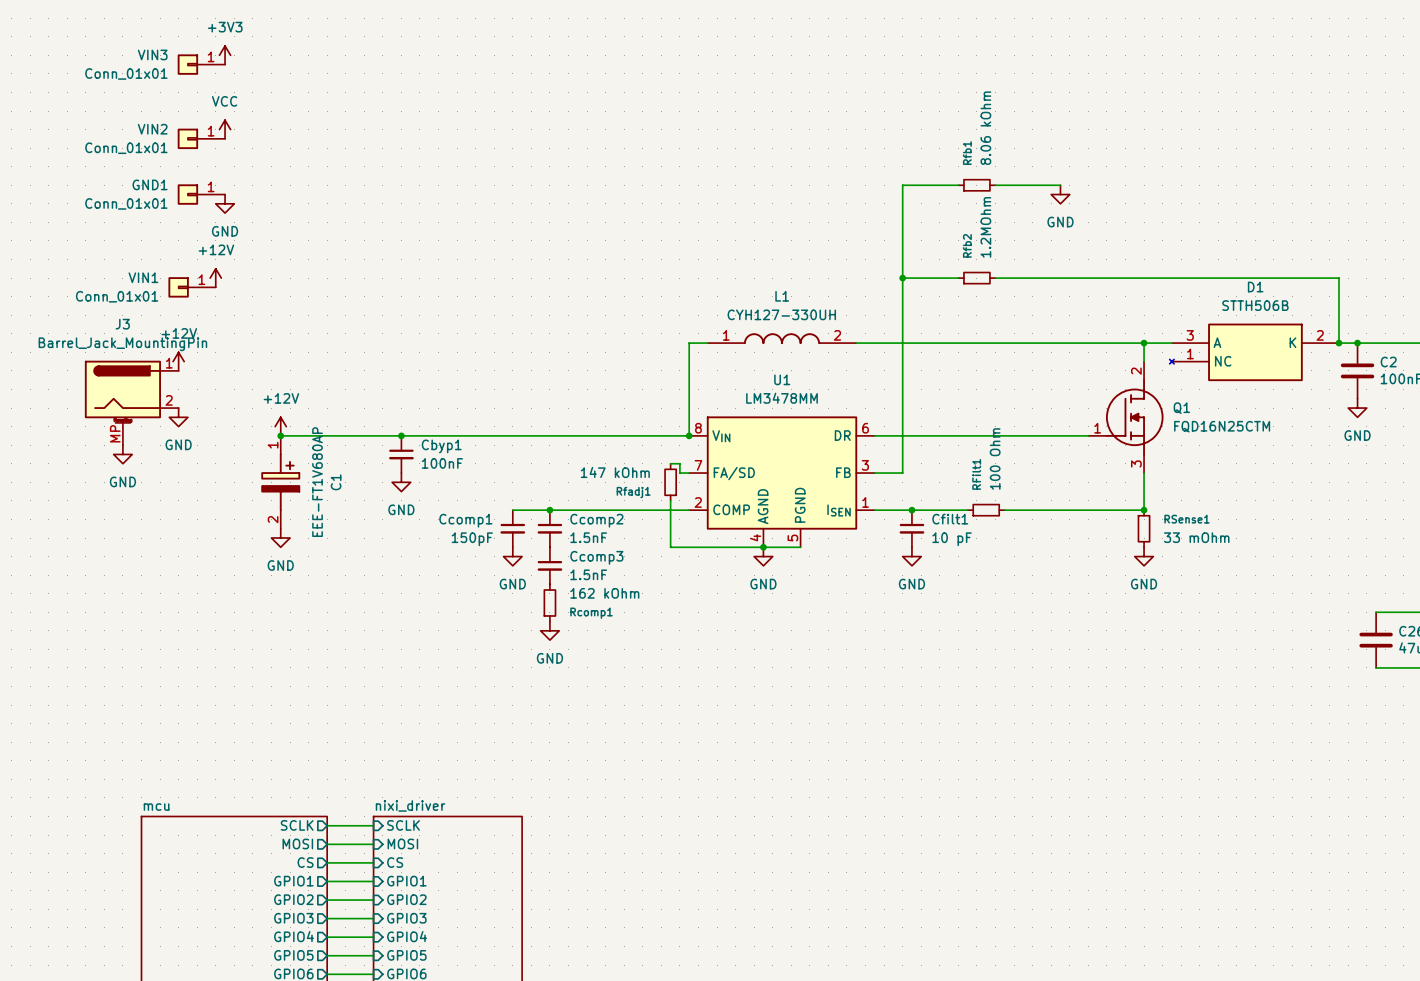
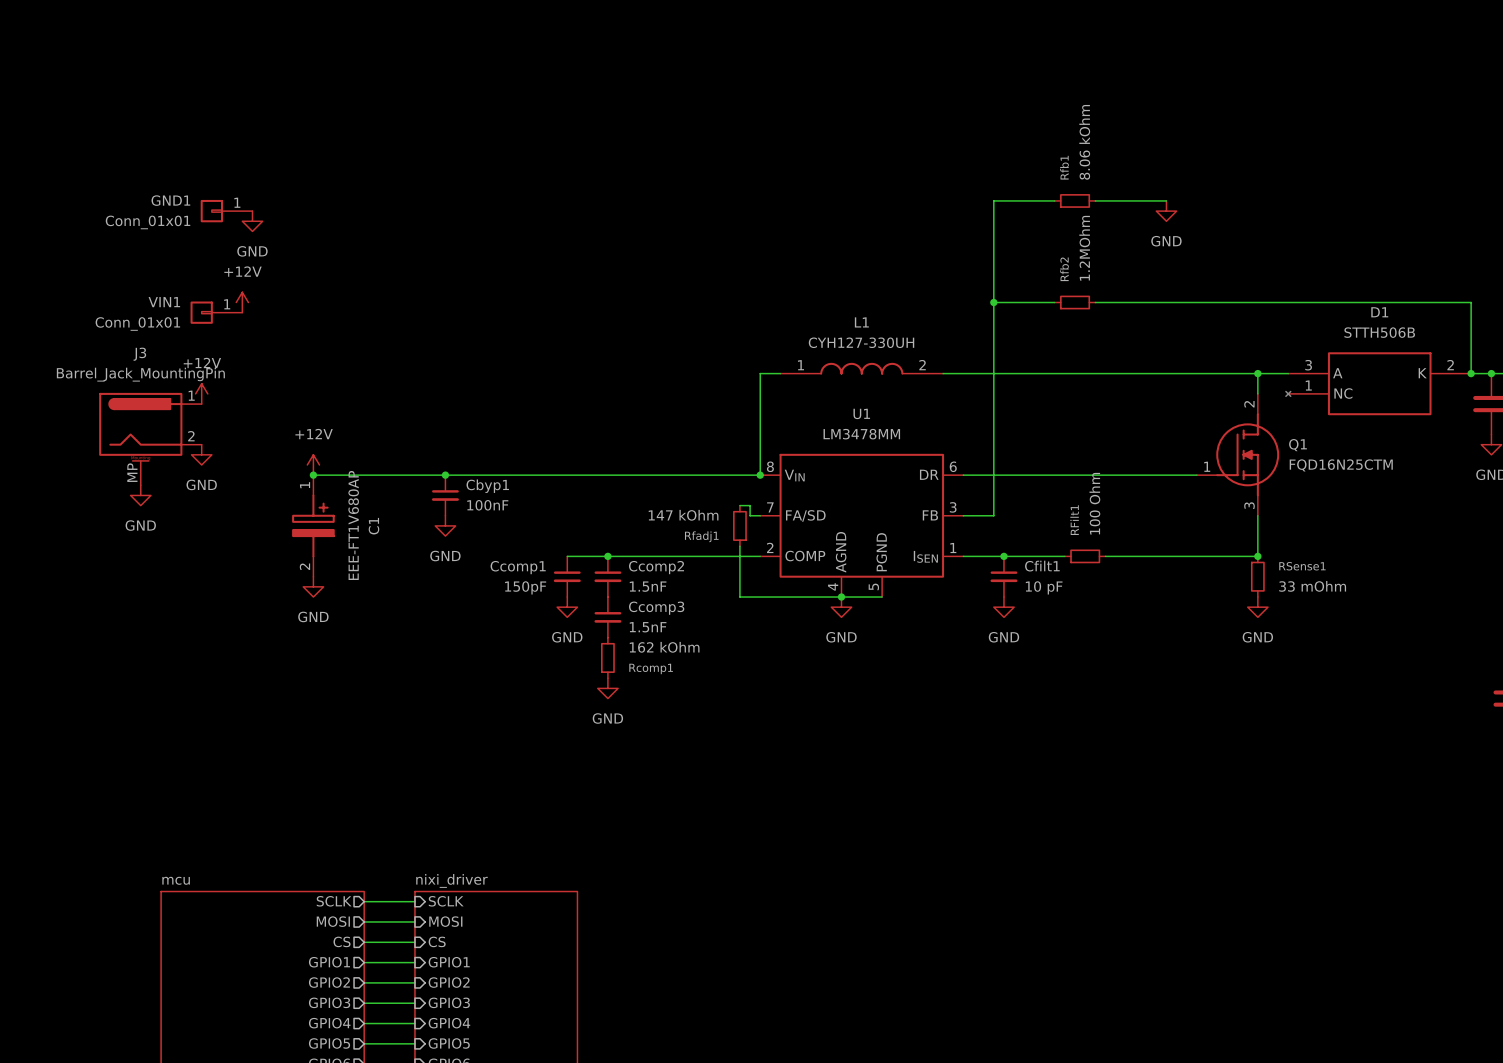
power symbol: +3V3 (225, 55) -> none
VIN3: Conn_01x01 (201, 64) -> none
power symbol: VCC (225, 129) -> none
VIN2: Conn_01x01 (201, 138) -> none

